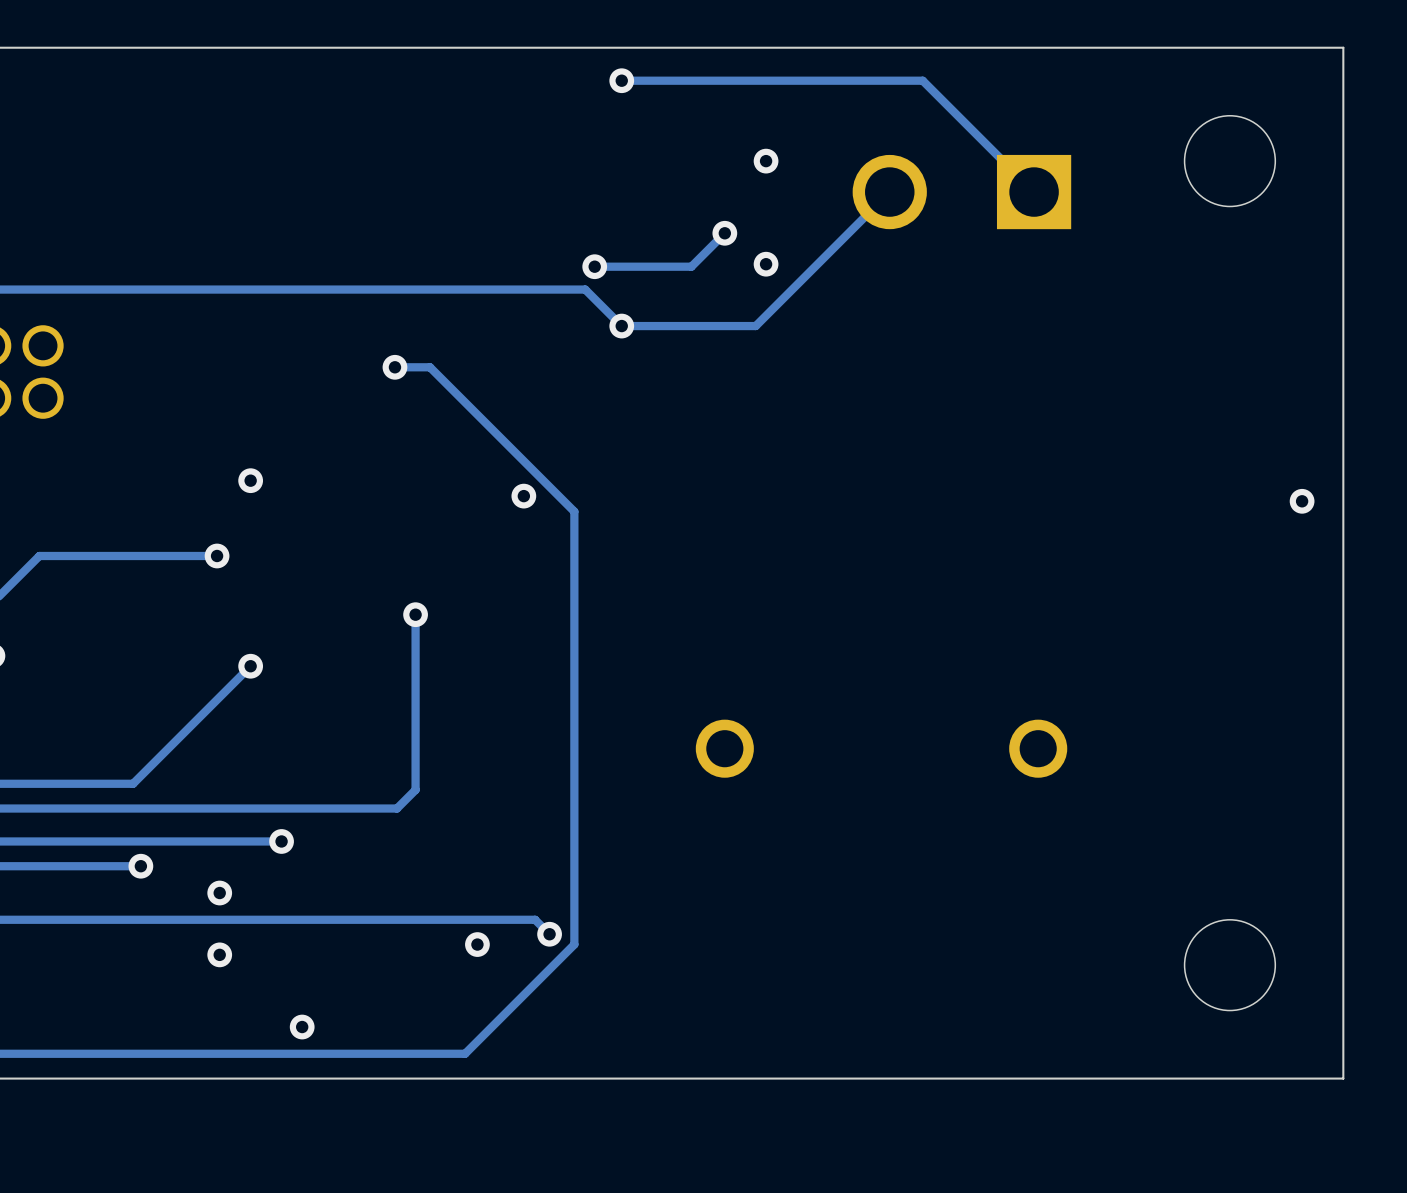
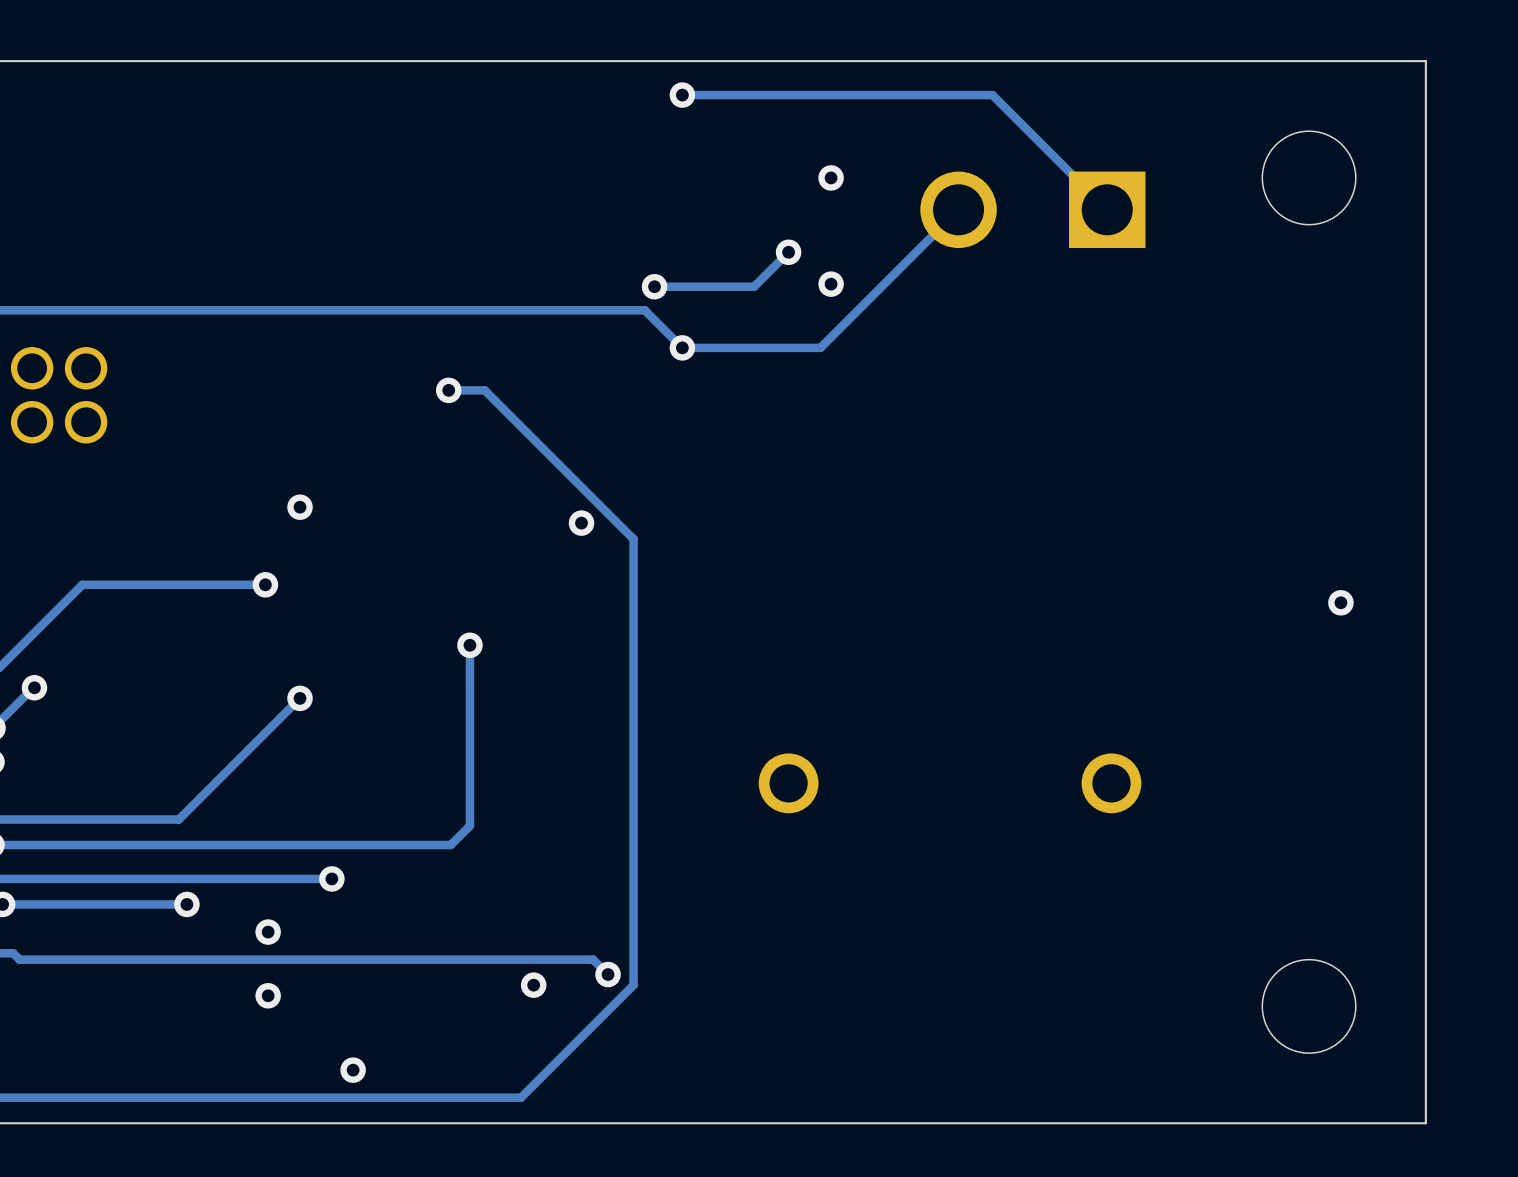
via position: (1302, 501) -> (1340, 602)

